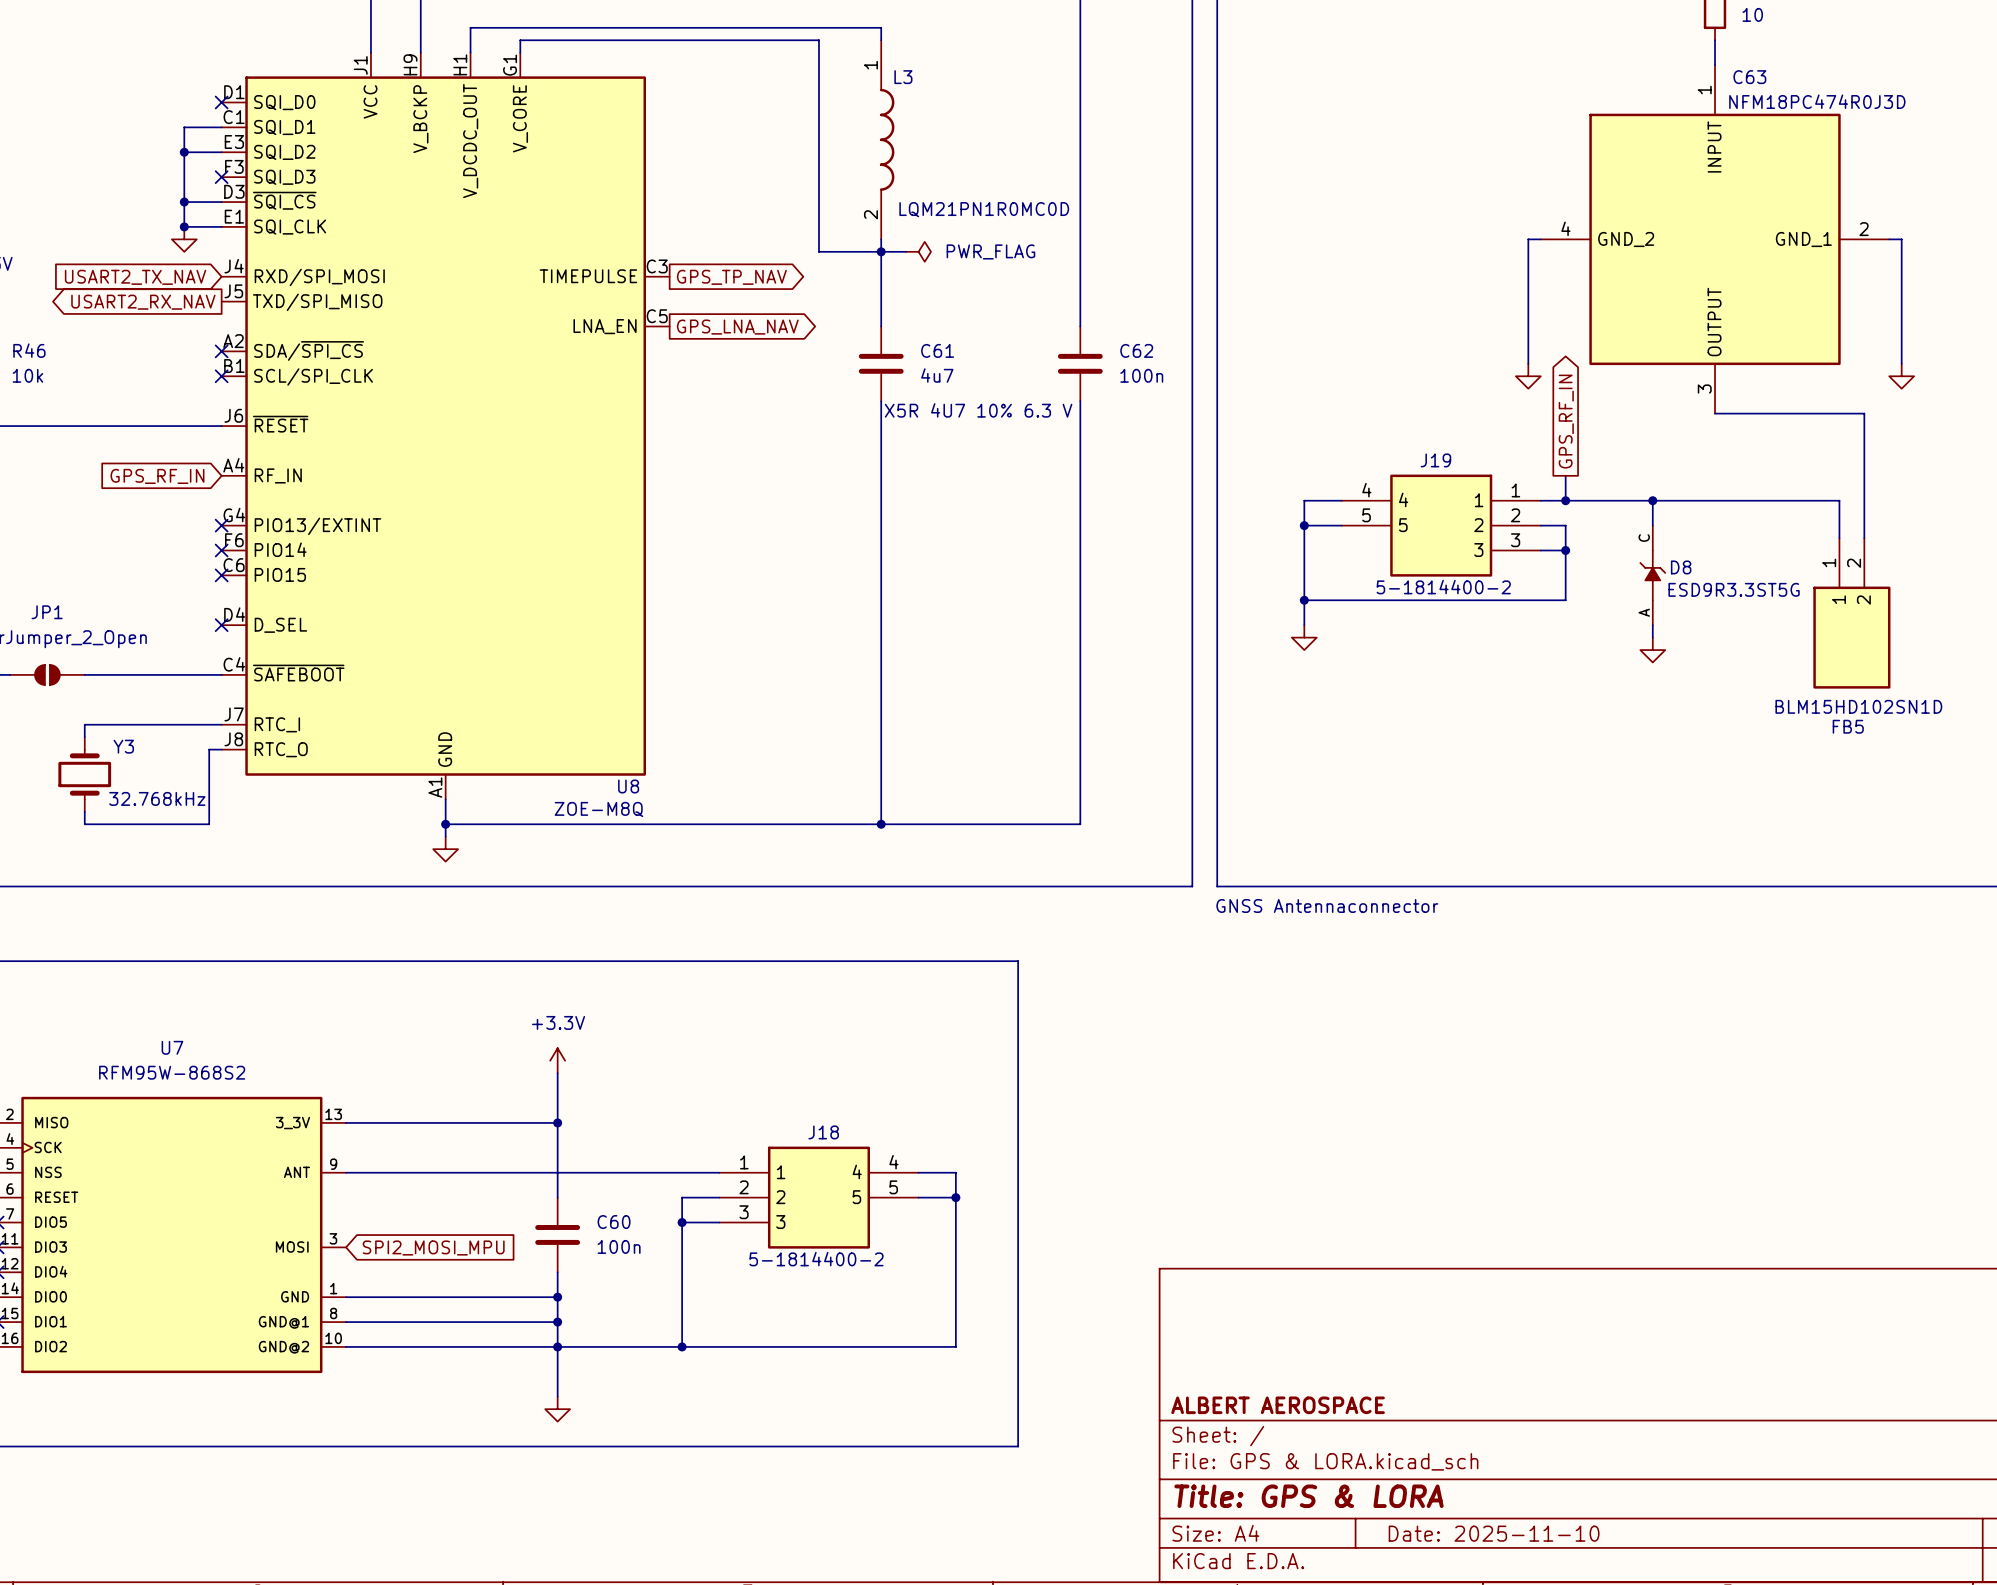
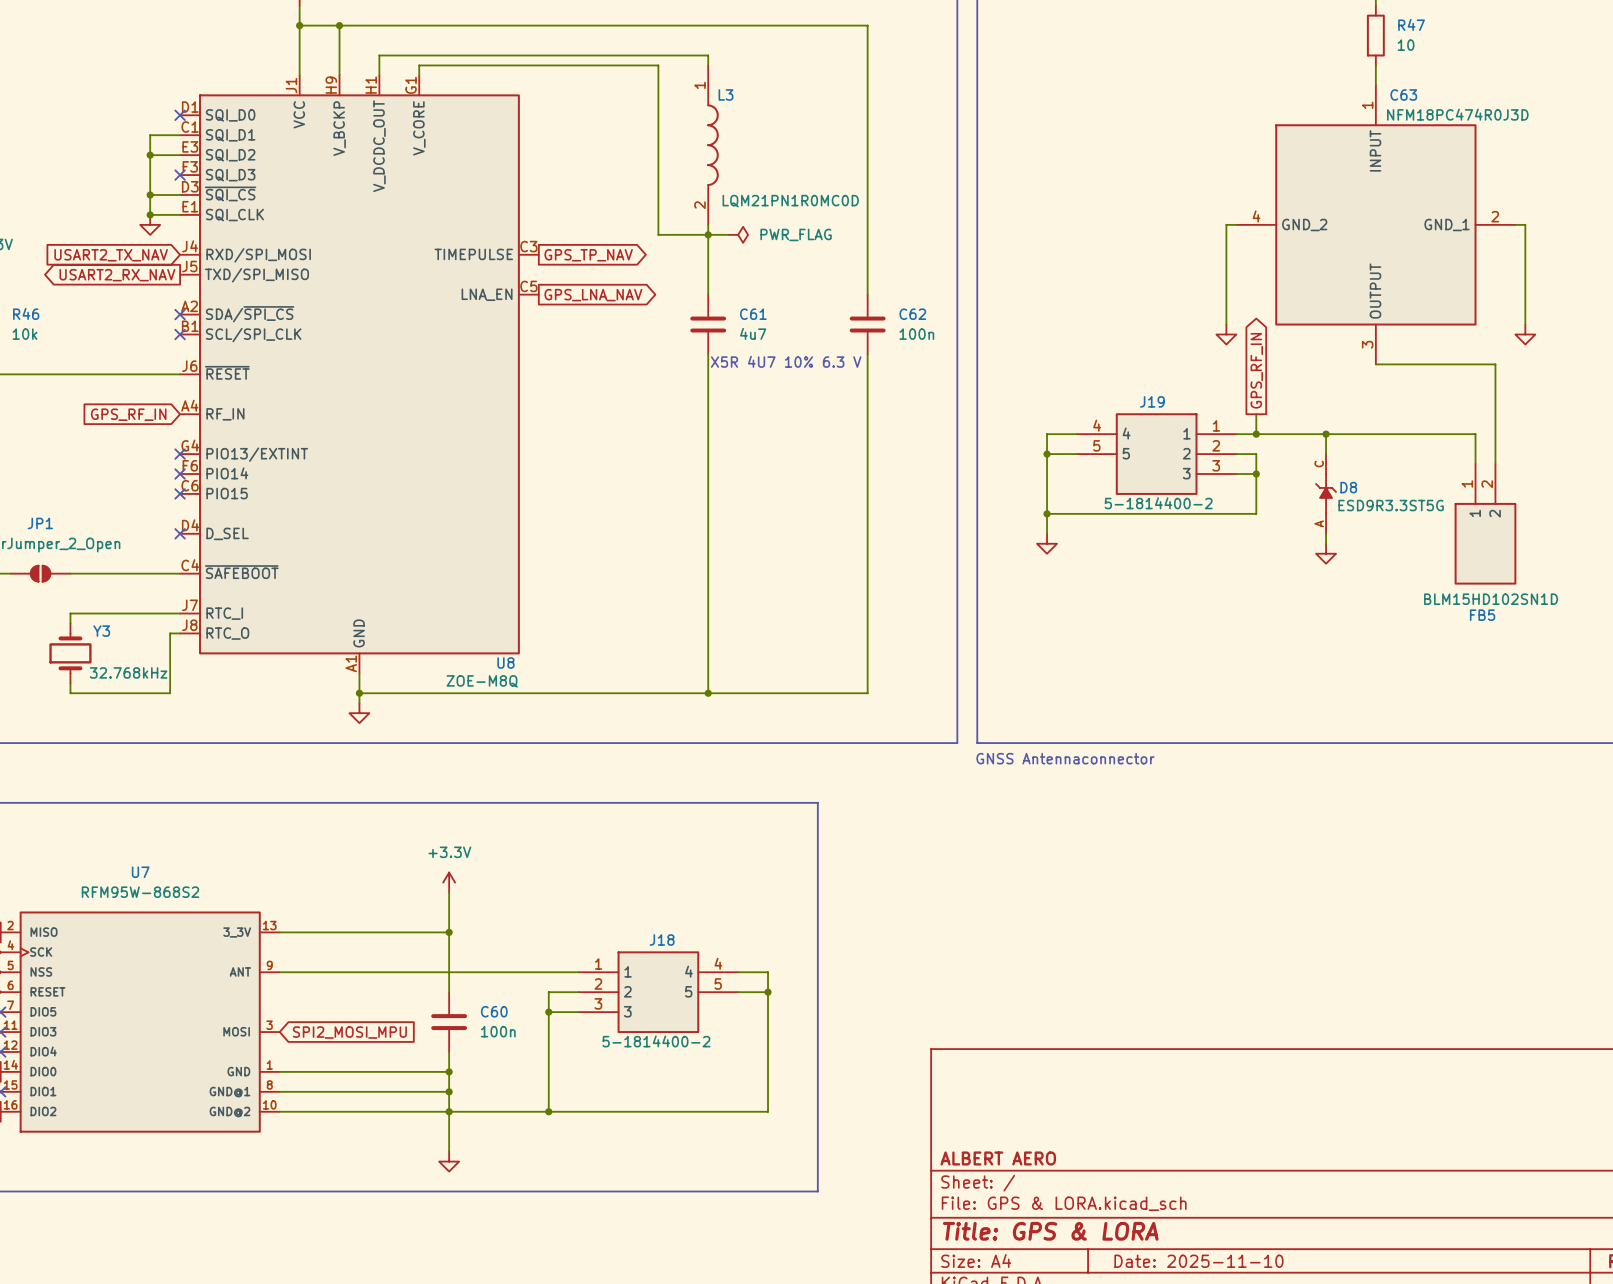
title block: ALBERT AEROSPACE (1278, 1405) -> ALBERT AERO (998, 1158)

